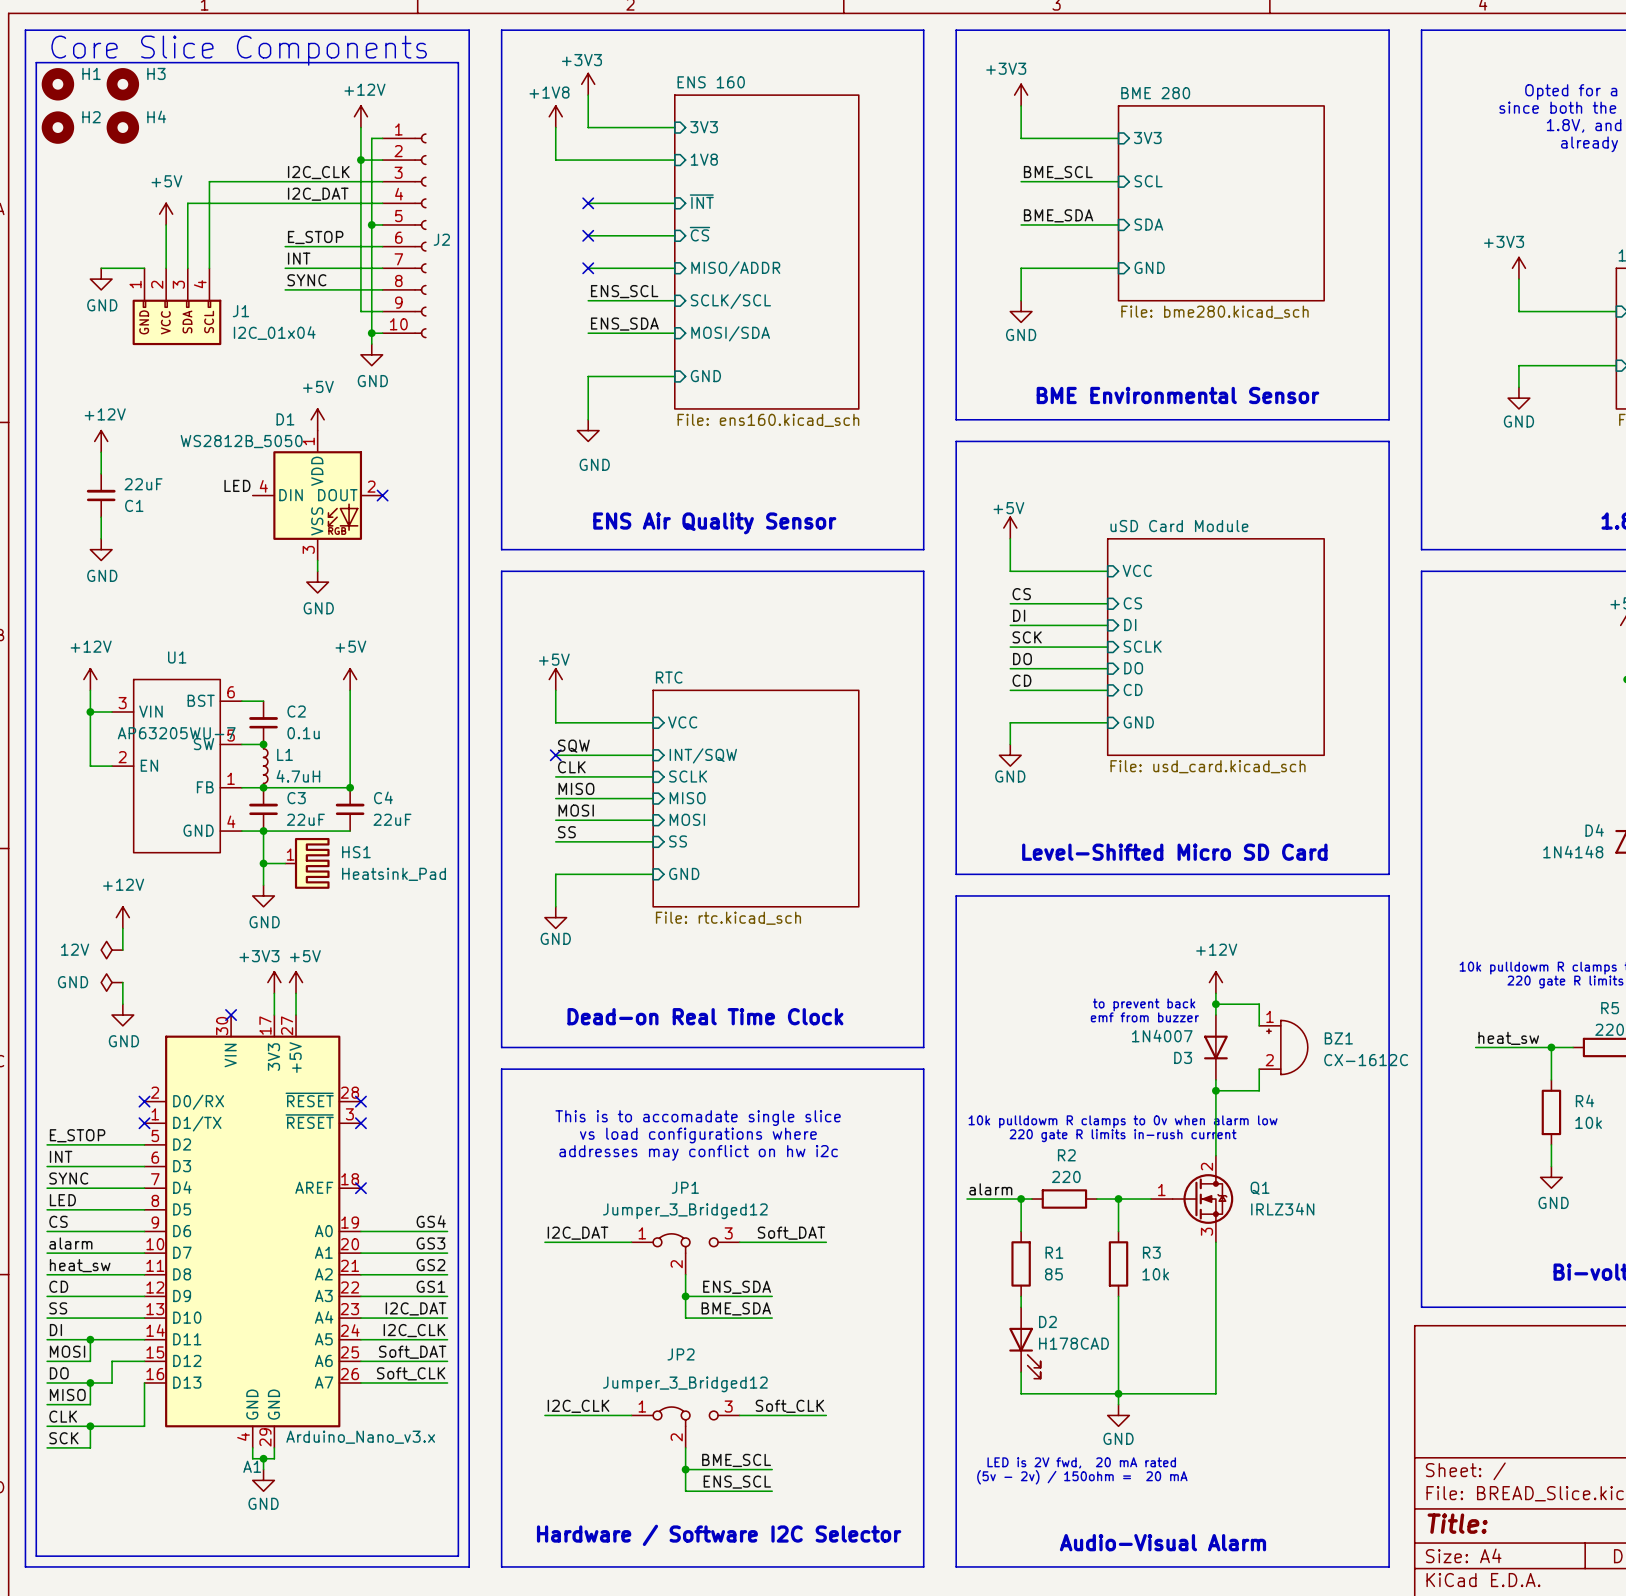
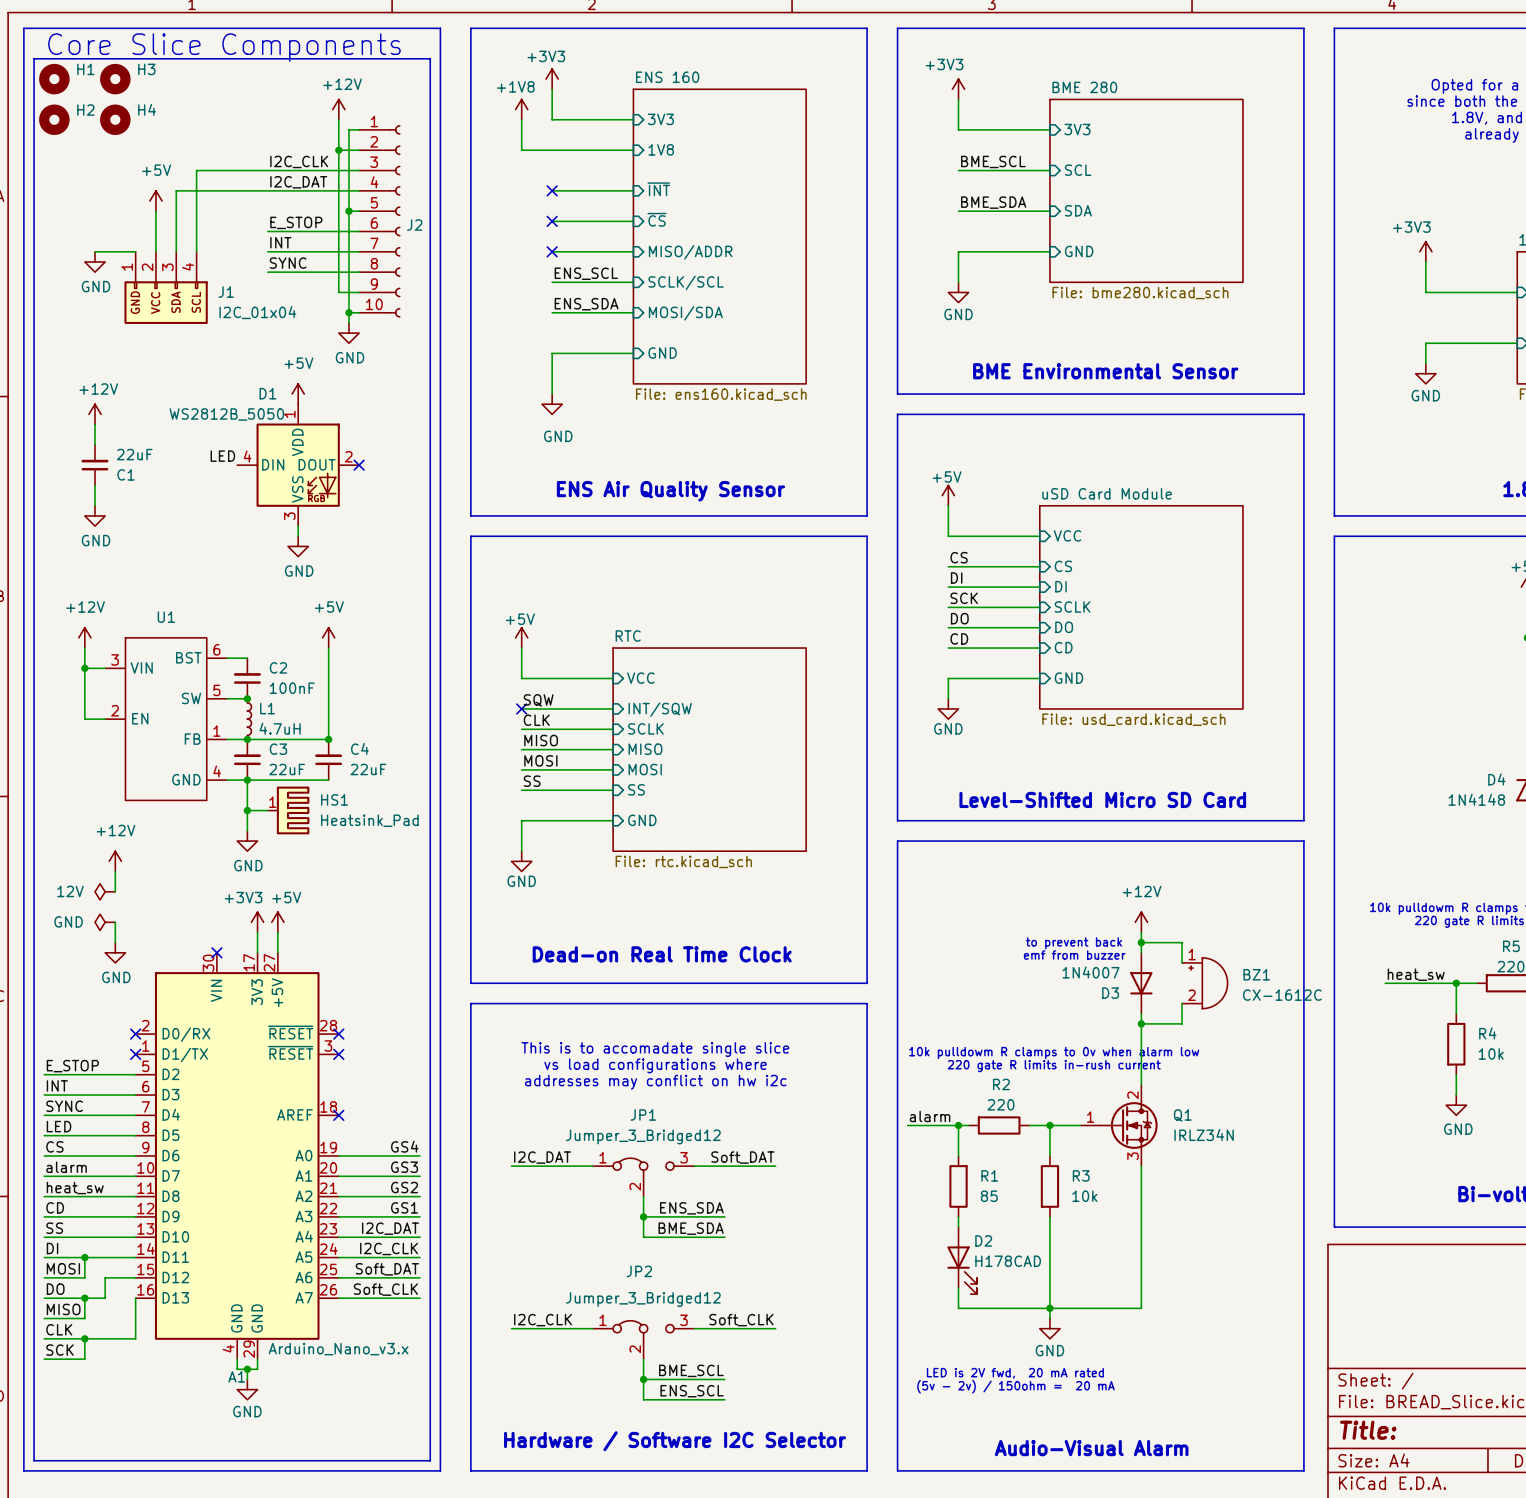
U1 value: AP63205WU-7 (176, 733) -> none
C2 value: 0.1u (303, 733) -> 100nF (292, 688)

